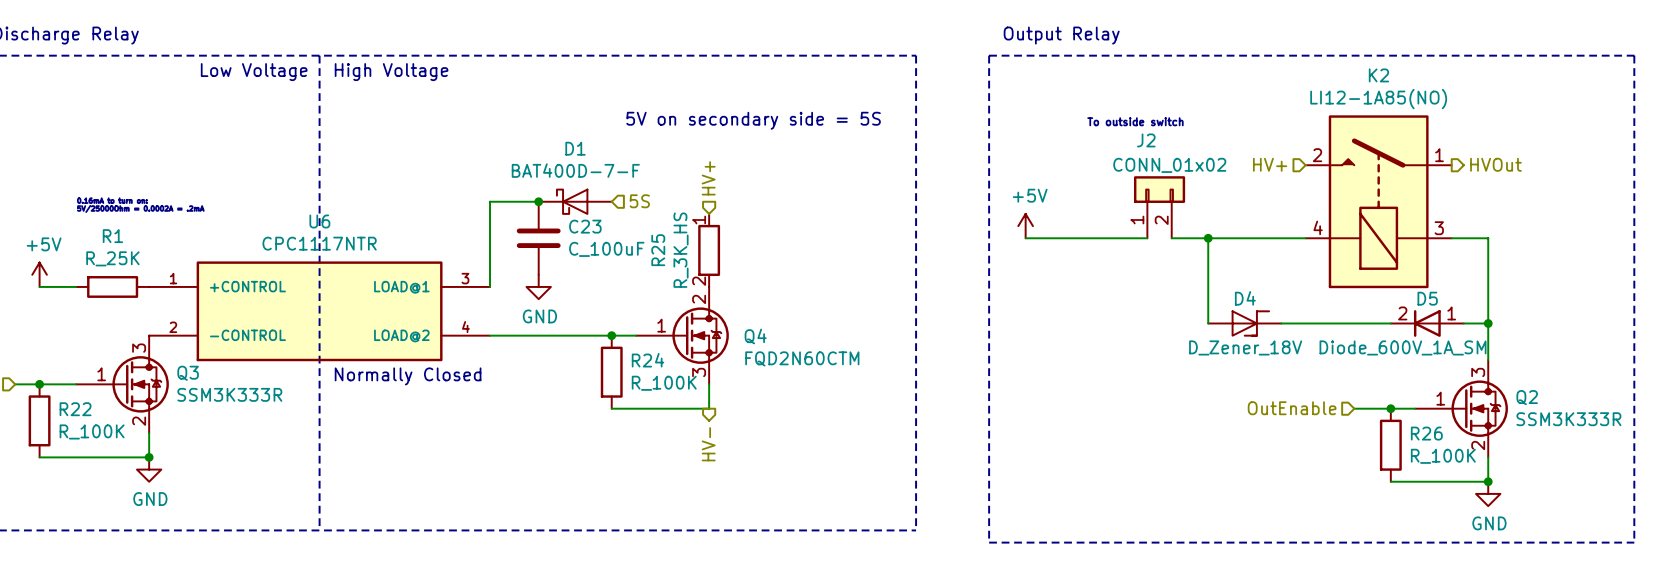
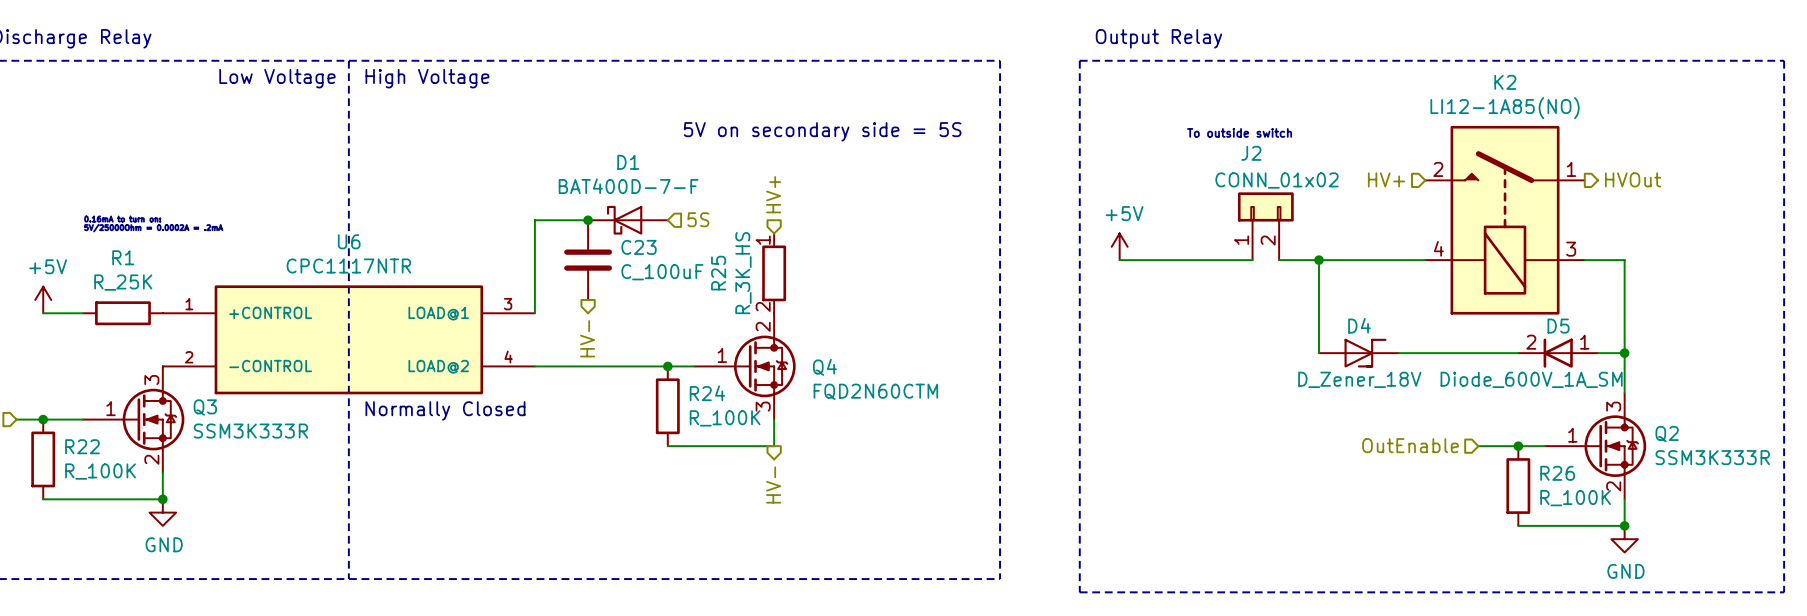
power symbol: GND (538, 286) -> none
hierarchical label: none -> HV- (587, 338)

